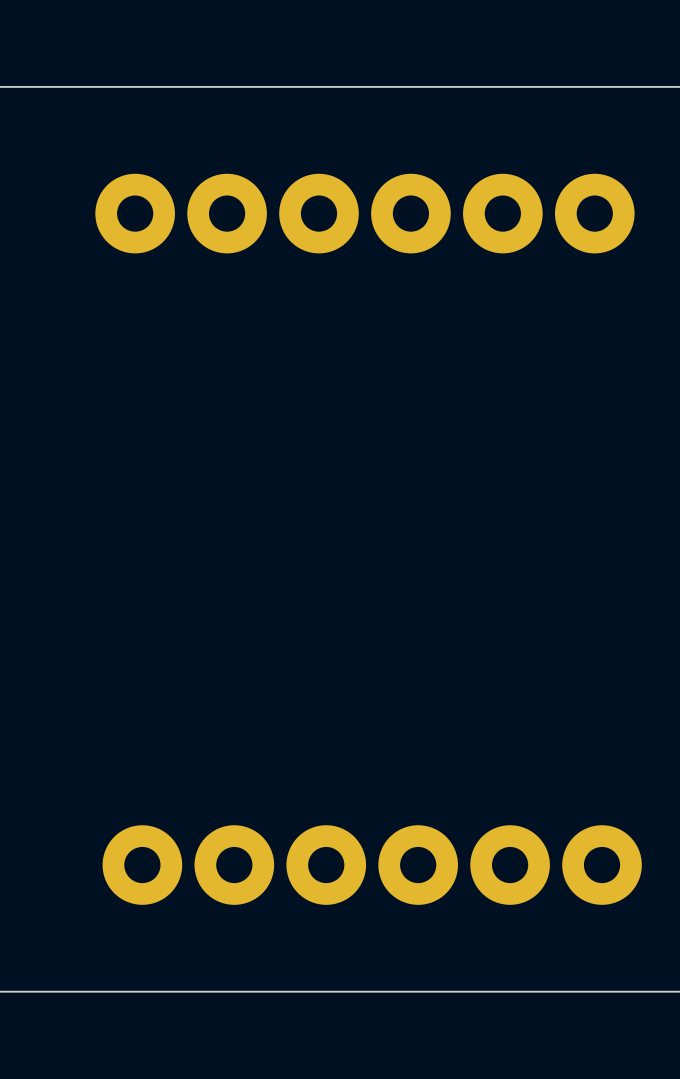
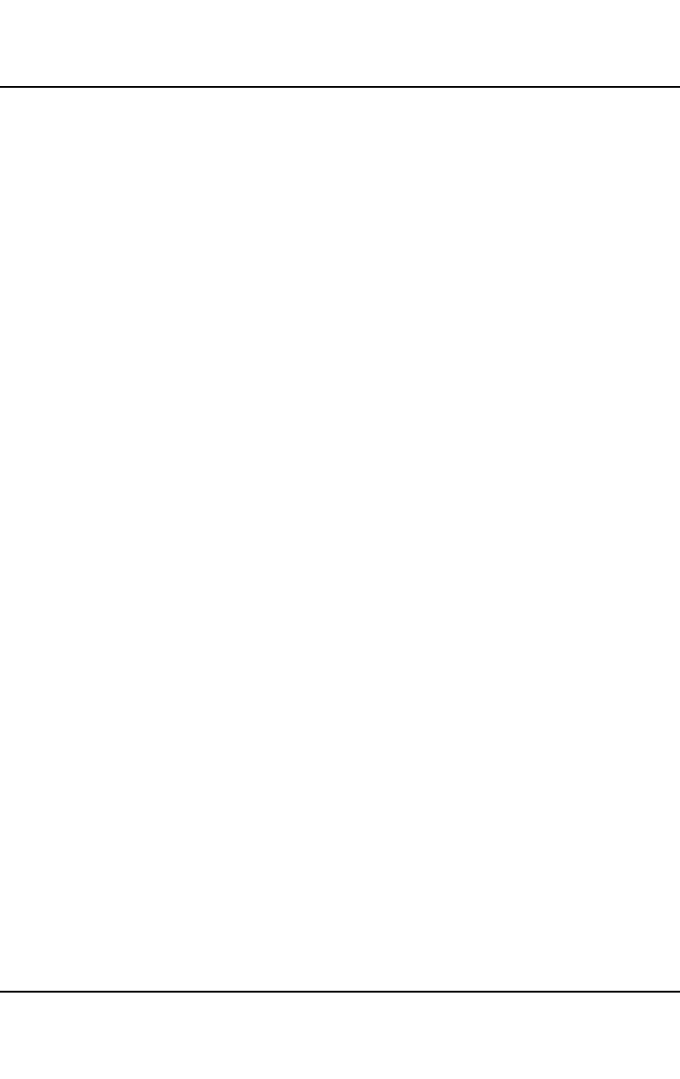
part: (364, 213) -> none
part: (372, 865) -> none

